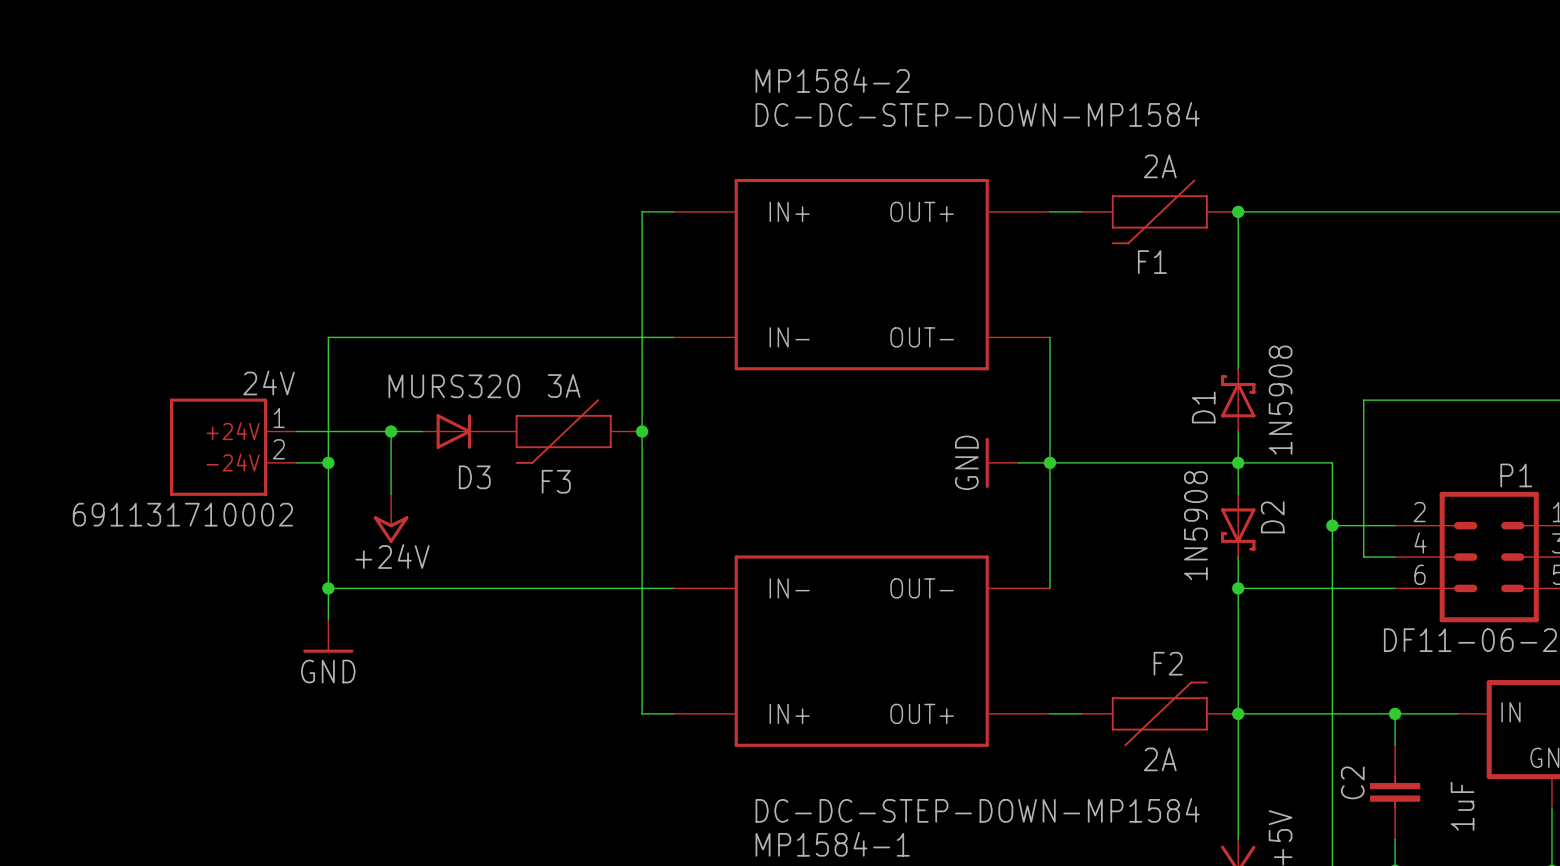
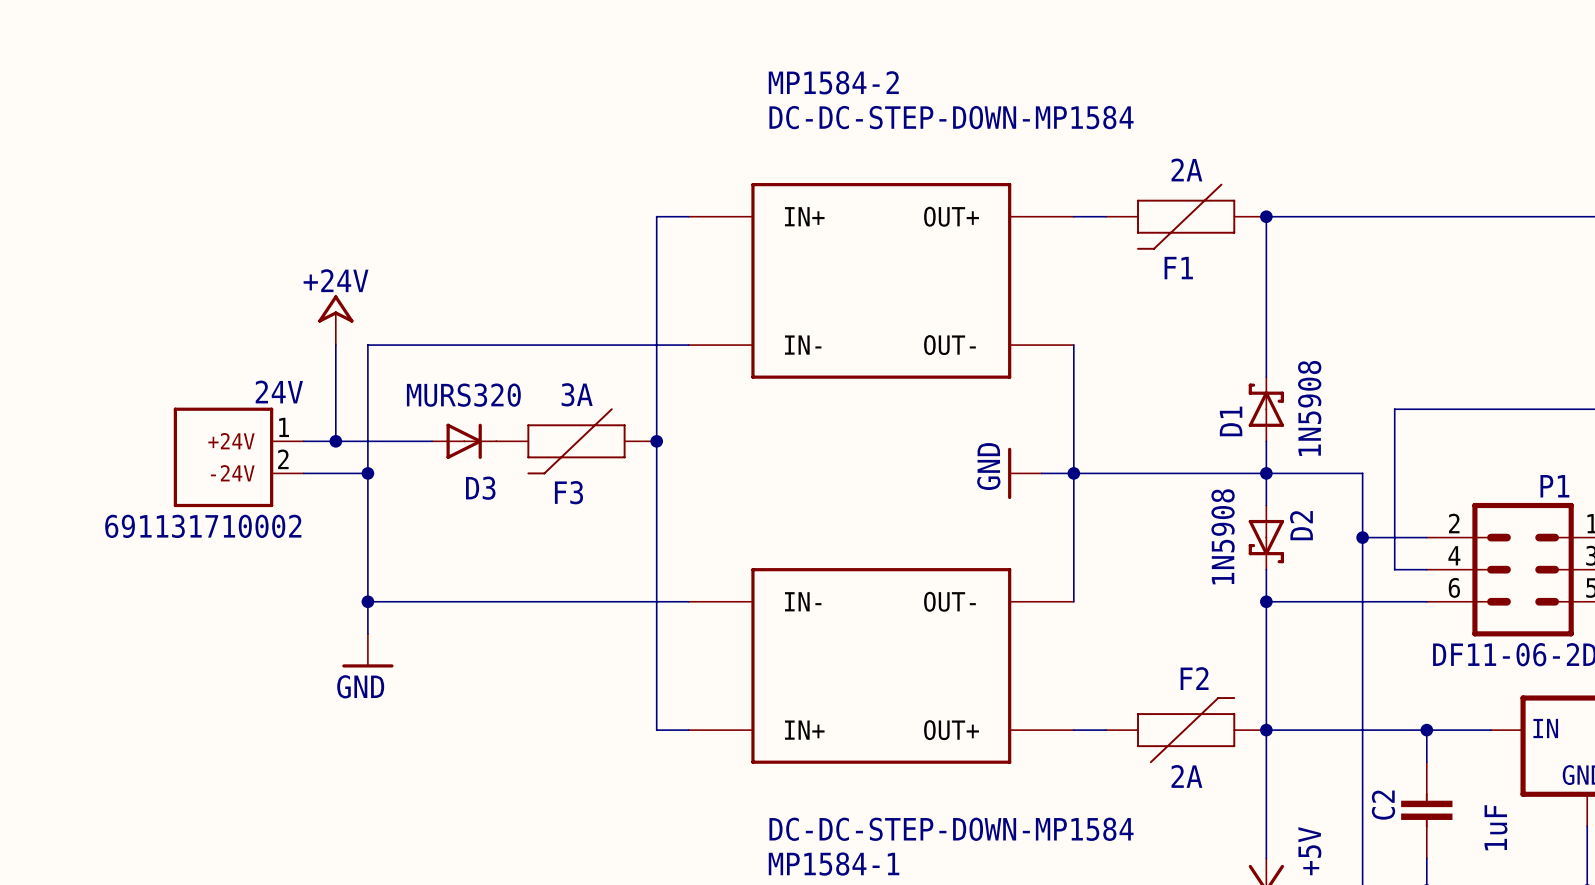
wire: (328, 337) (359, 337) -> (367, 633) (367, 345)
wire: (328, 431) (328, 619) -> none
junction: none -> (335, 441)
wire: (391, 431) (391, 494) -> none
junction: (391, 431) -> none
junction: (328, 462) -> none
junction: none -> (367, 473)
power symbol position: +24V (391, 518) -> +24V (335, 320)
power symbol rotation: 0° (391, 529) -> 180° (335, 308)
wire: (328, 588) (359, 588) -> (335, 473) (367, 473)
junction position: (328, 588) -> (367, 601)
power symbol position: GND (328, 636) -> GND (367, 650)

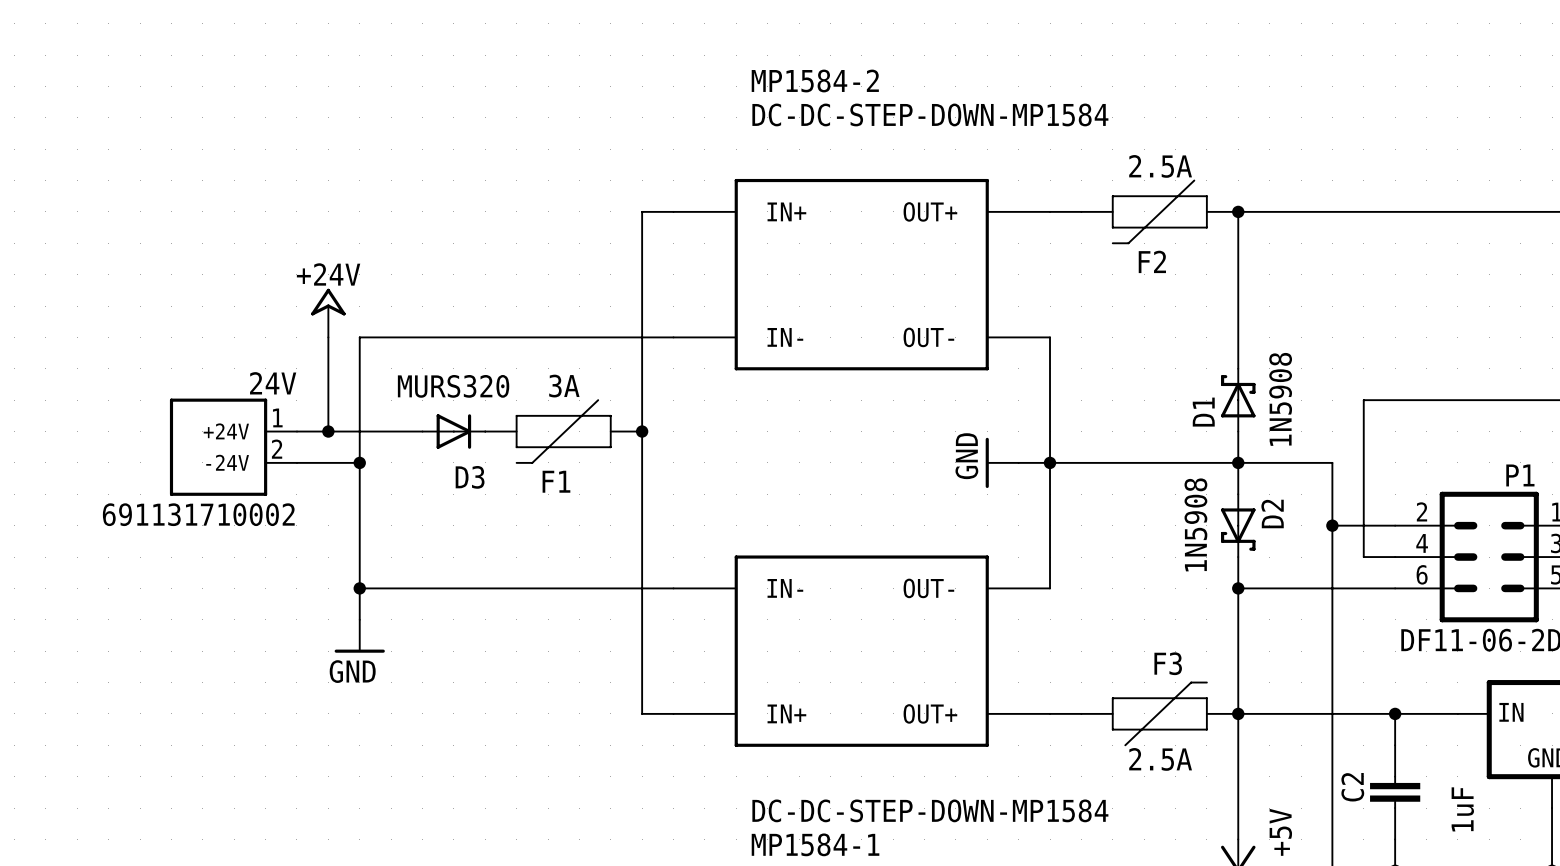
F1 value: 2A (1186, 169) -> 2.5A (1160, 166)
F1 name: F1 (1178, 268) -> F2 (1152, 261)
F3 name: F3 (568, 492) -> F1 (556, 481)
F2 name: F2 (1194, 678) -> F3 (1168, 663)
F2 value: 2A (1186, 776) -> 2.5A (1160, 759)

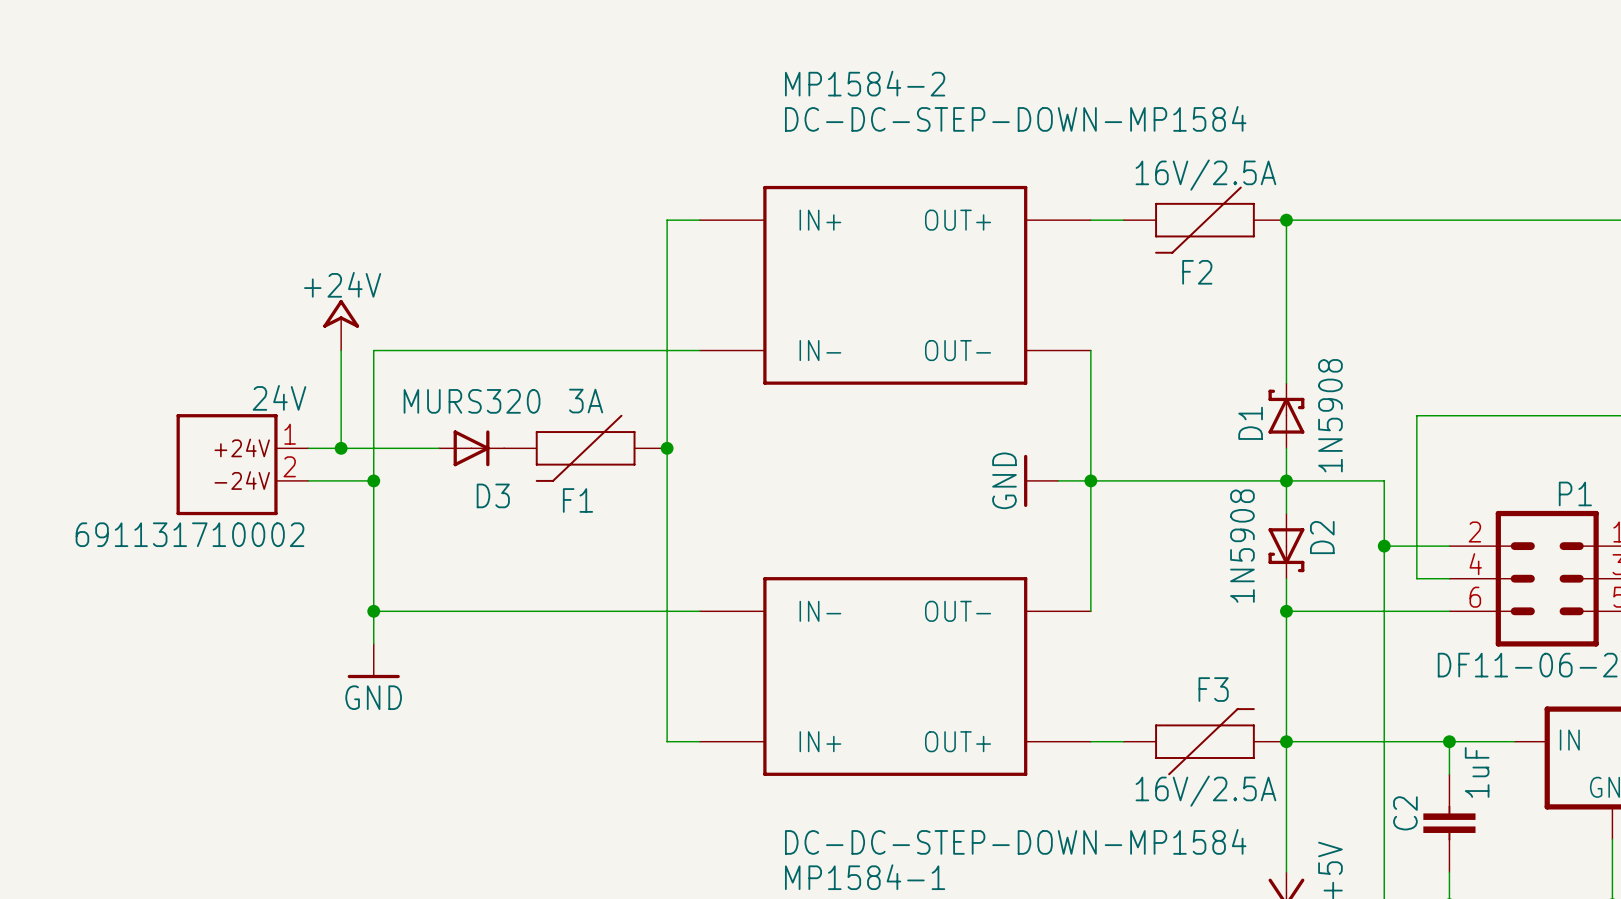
F2 value: 2.5A (1160, 166) -> 16V/2.5A (1205, 175)
F3 value: 2.5A (1160, 759) -> 16V/2.5A (1205, 791)
C2 value position: 1uF (1462, 809) -> 1uF (1477, 772)

